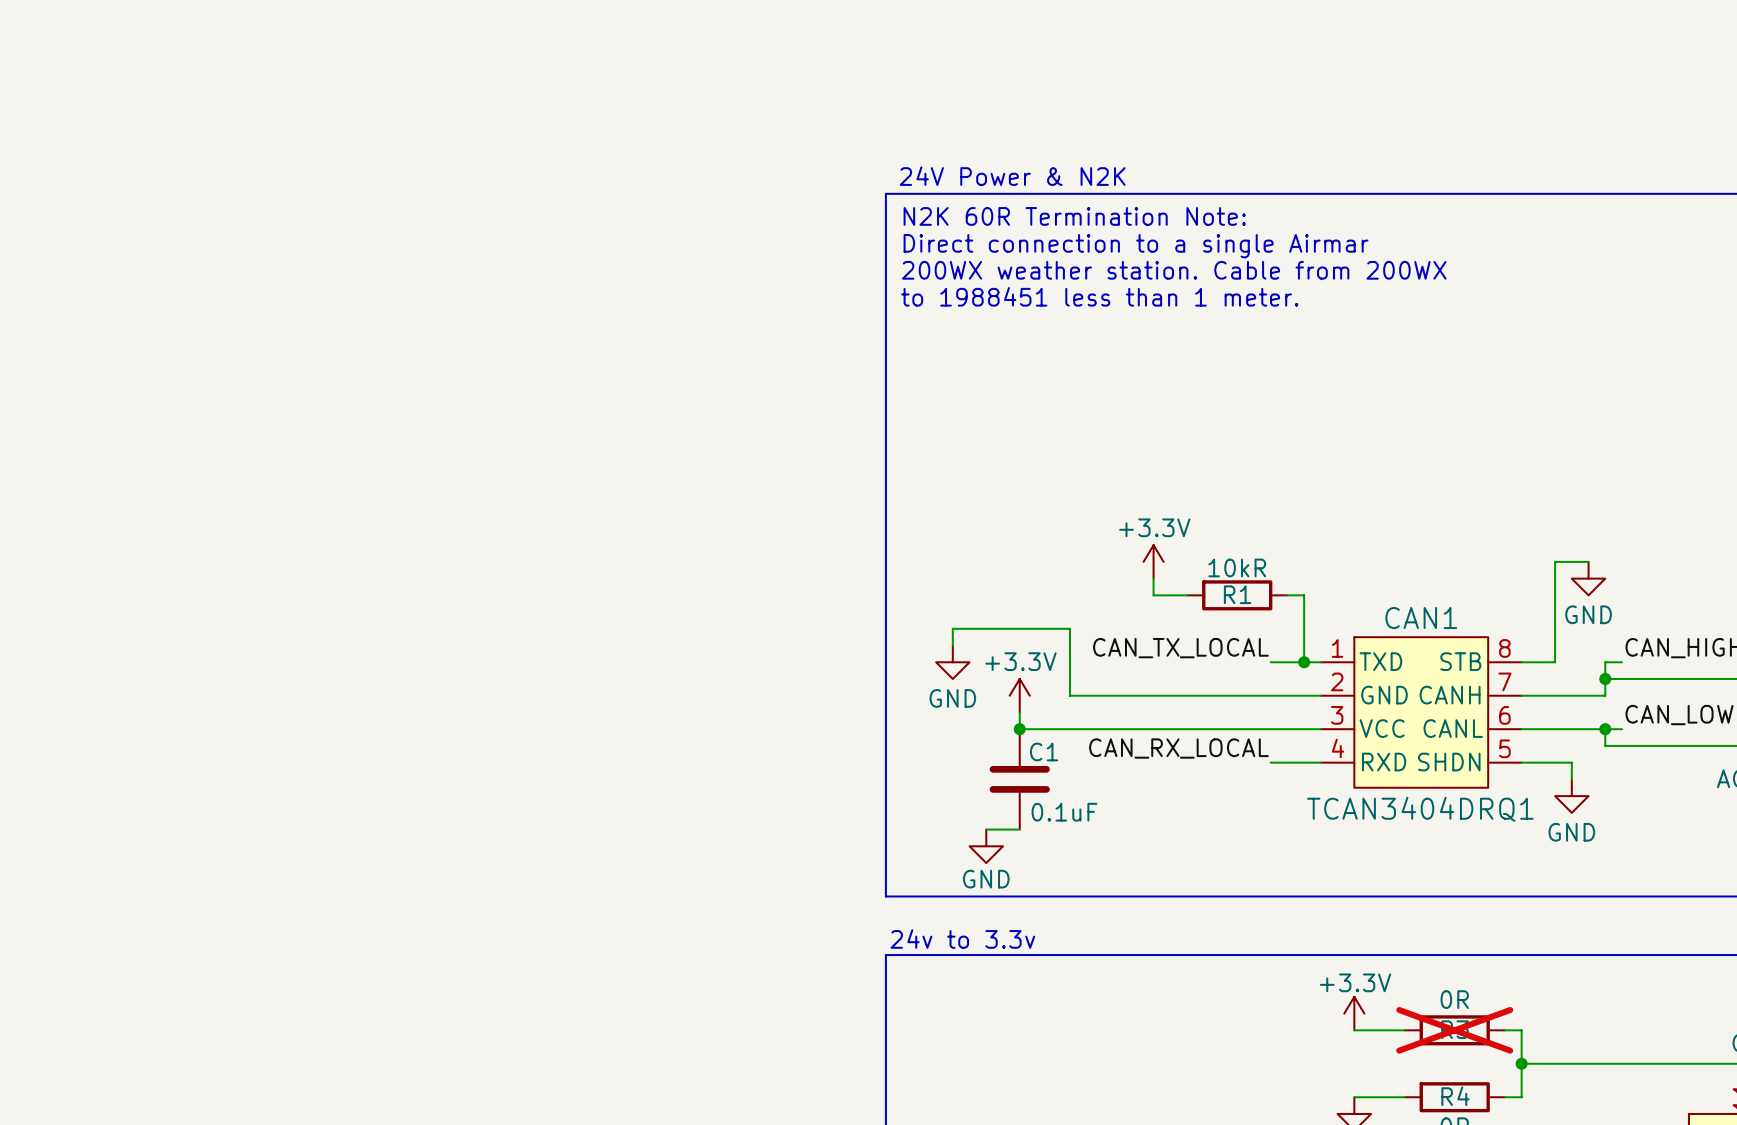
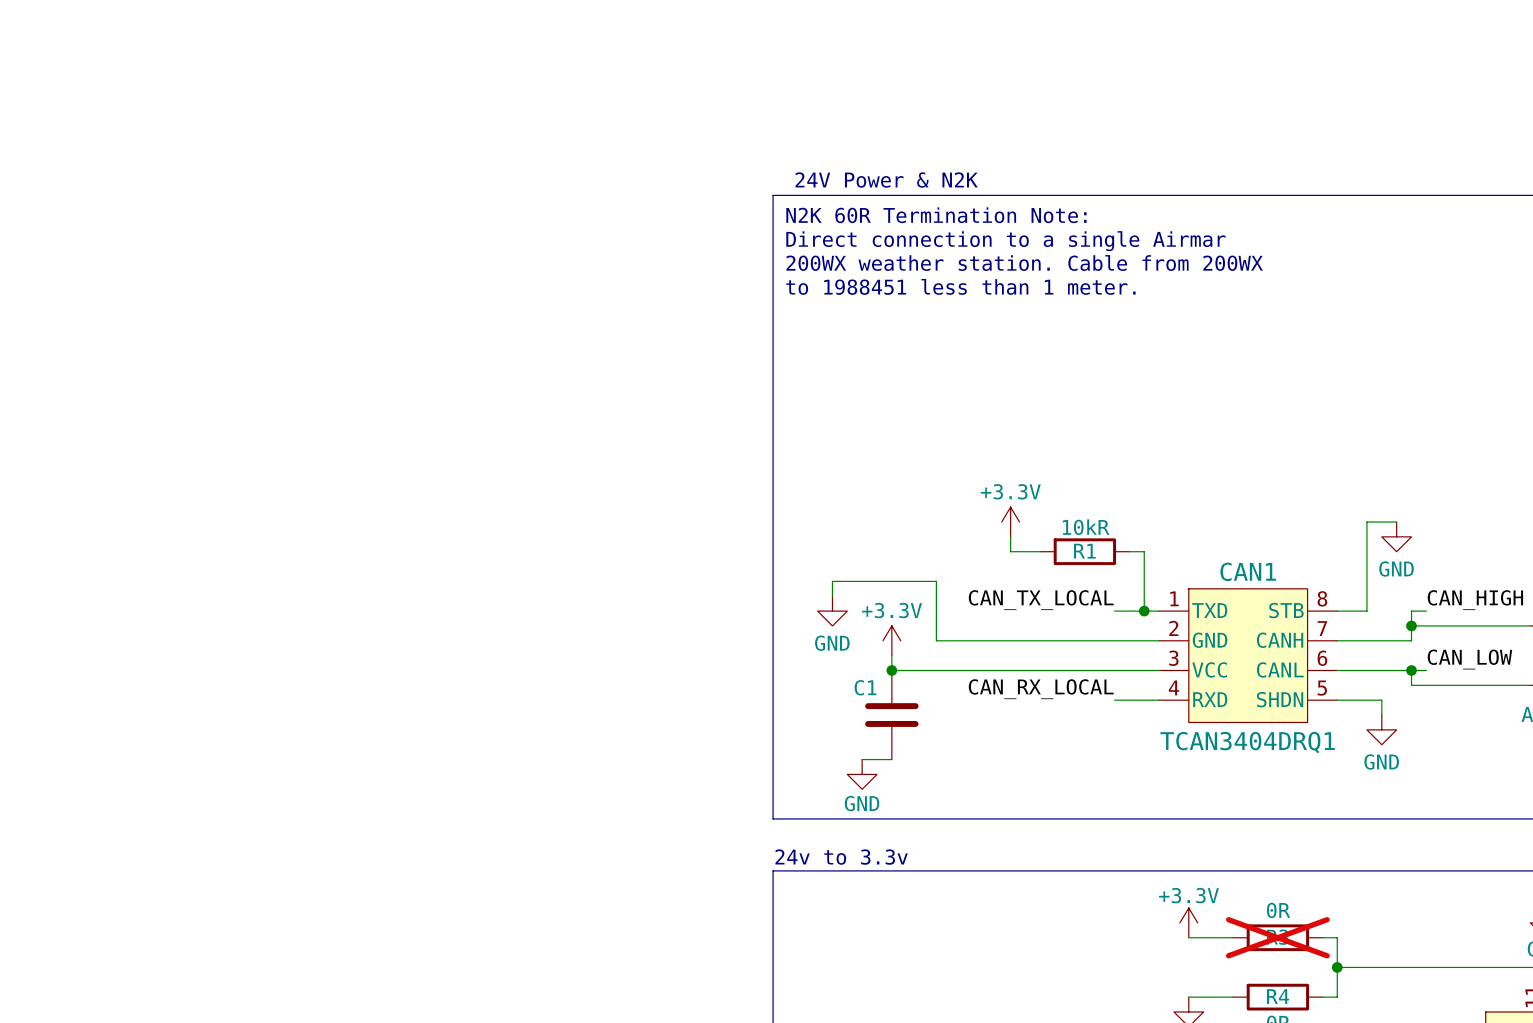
C1 name position: C1 (1044, 751) -> C1 (865, 687)
C1 value: 0.1uF (1064, 812) -> none

